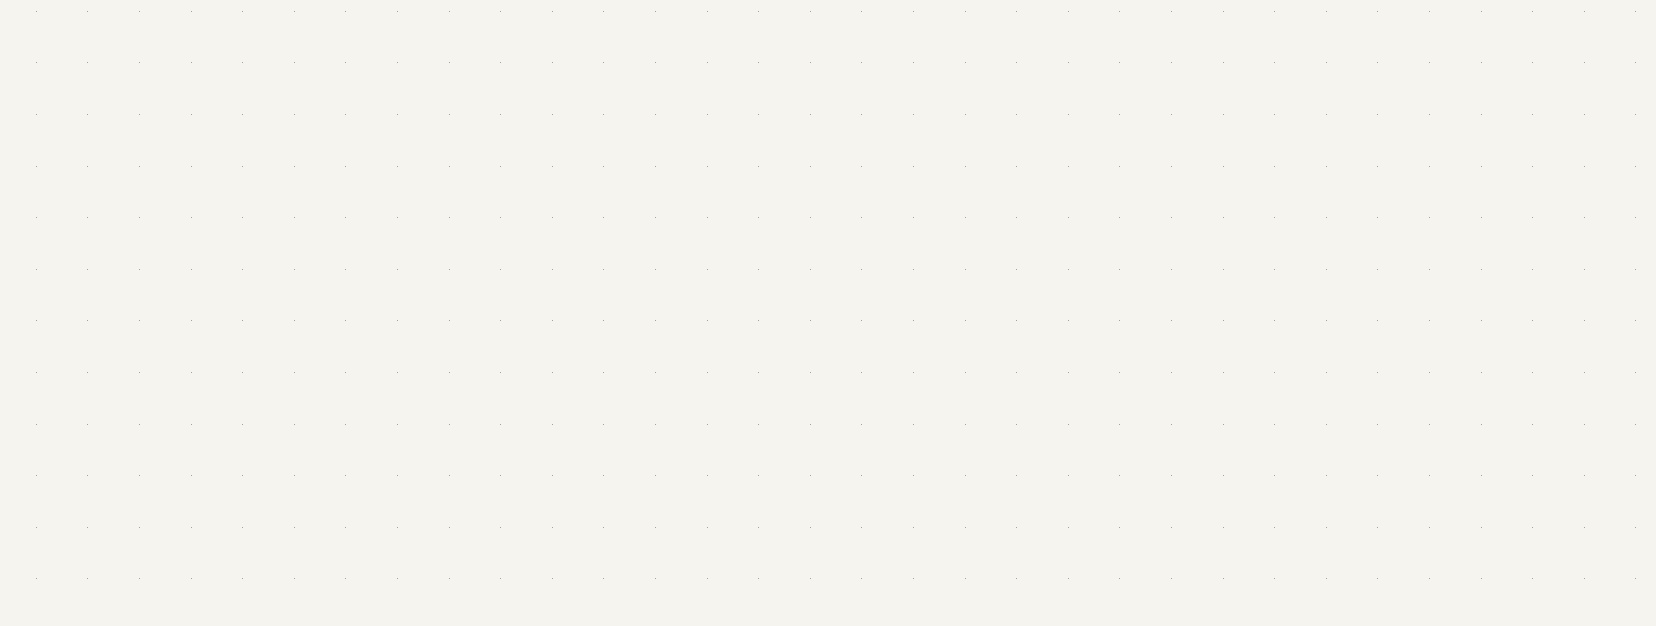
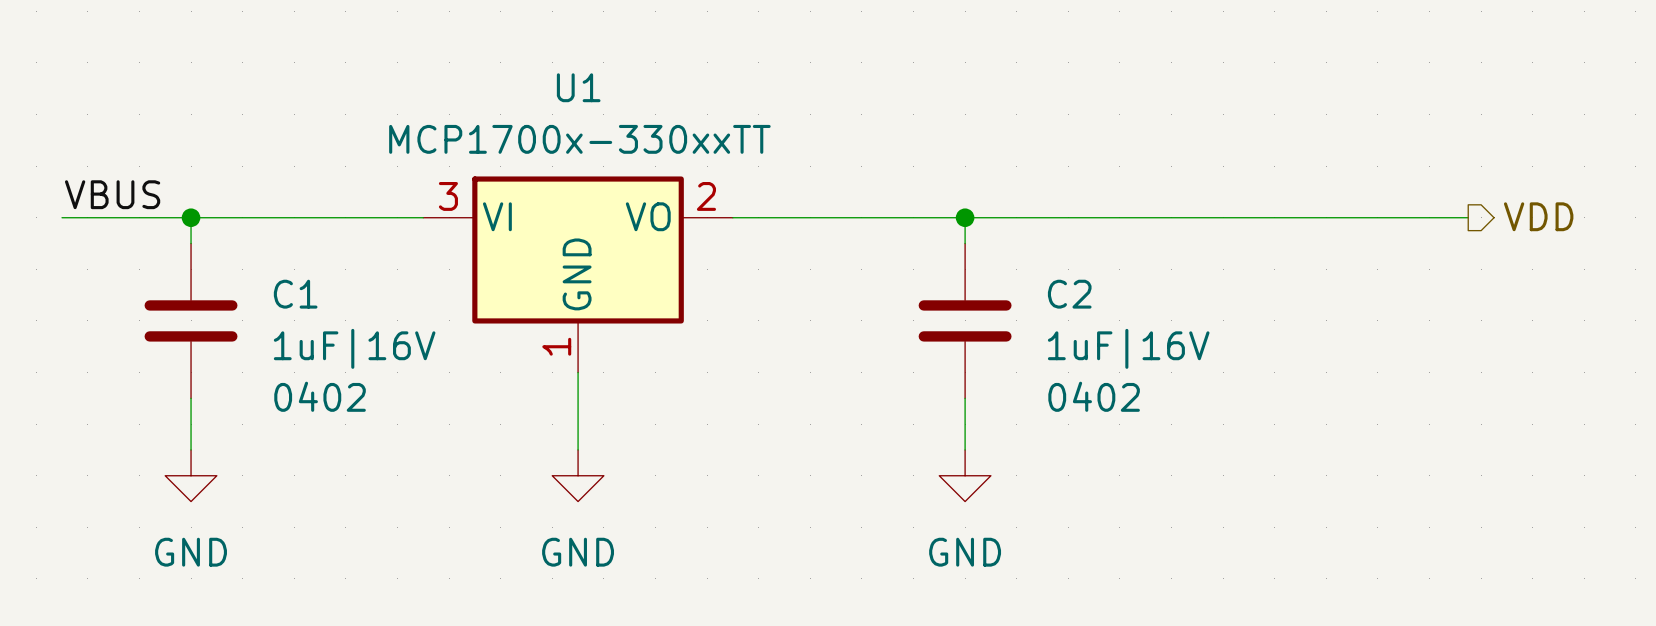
label: none -> VBUS (112, 194)
hierarchical label: none -> VDD (1538, 216)
wire: none -> (62, 217) (423, 217)
wire: none -> (191, 217) (191, 243)
junction: none -> (191, 217)
wire: none -> (732, 217) (1468, 217)
wire: none -> (965, 217) (965, 243)
junction: none -> (965, 217)
U1: none -> MCP1700x-330xxTT (578, 274)
C1: none -> 1uF|16V (191, 320)
C2: none -> 1uF|16V (965, 320)
wire: none -> (578, 372) (578, 449)
wire: none -> (191, 398) (191, 449)
wire: none -> (965, 398) (965, 449)
power symbol: none -> GND (191, 475)
power symbol: none -> GND (578, 475)
power symbol: none -> GND (965, 475)

